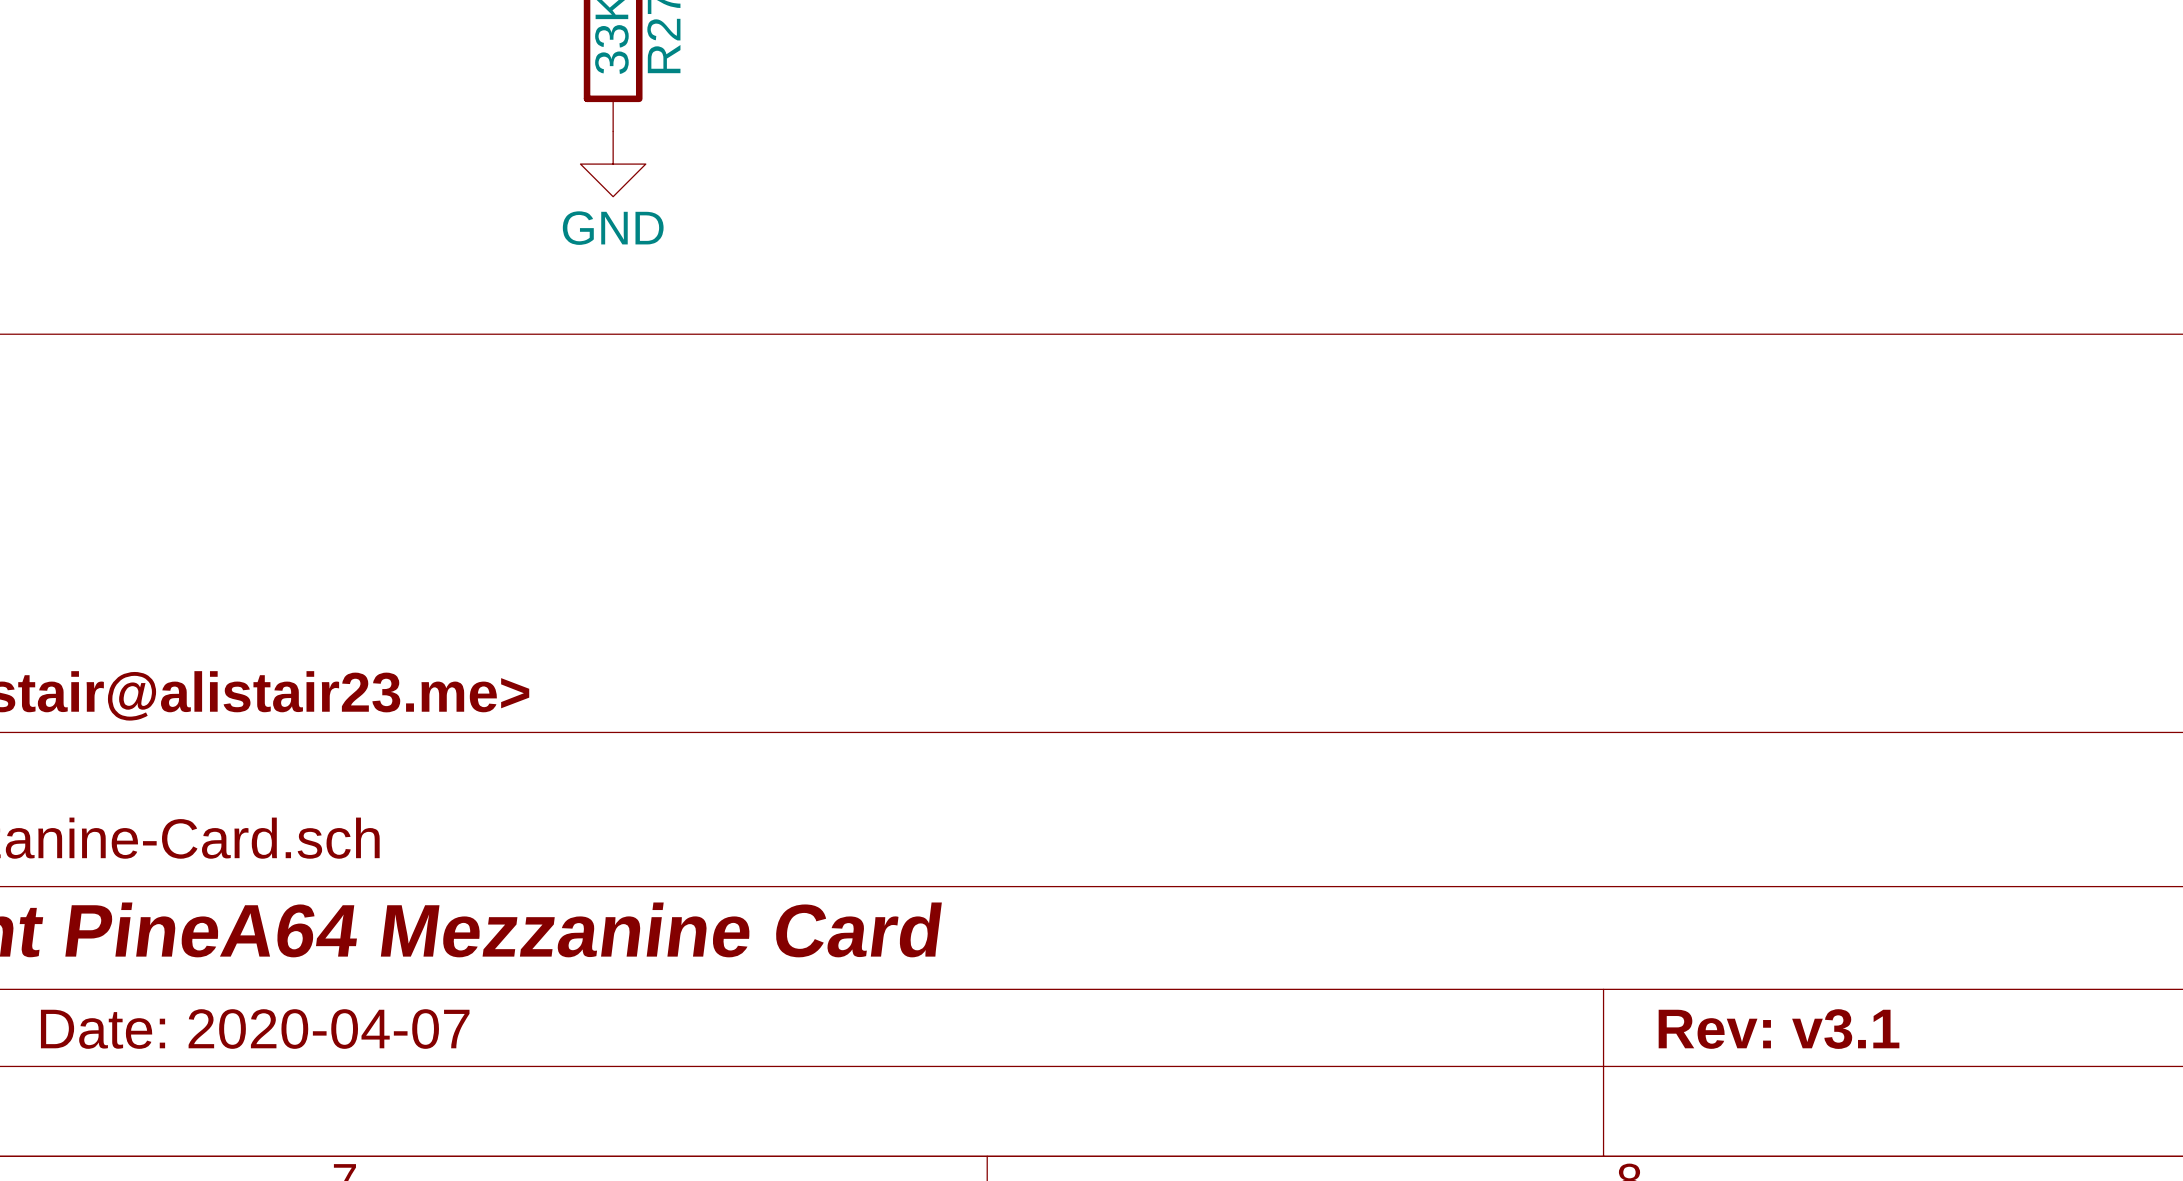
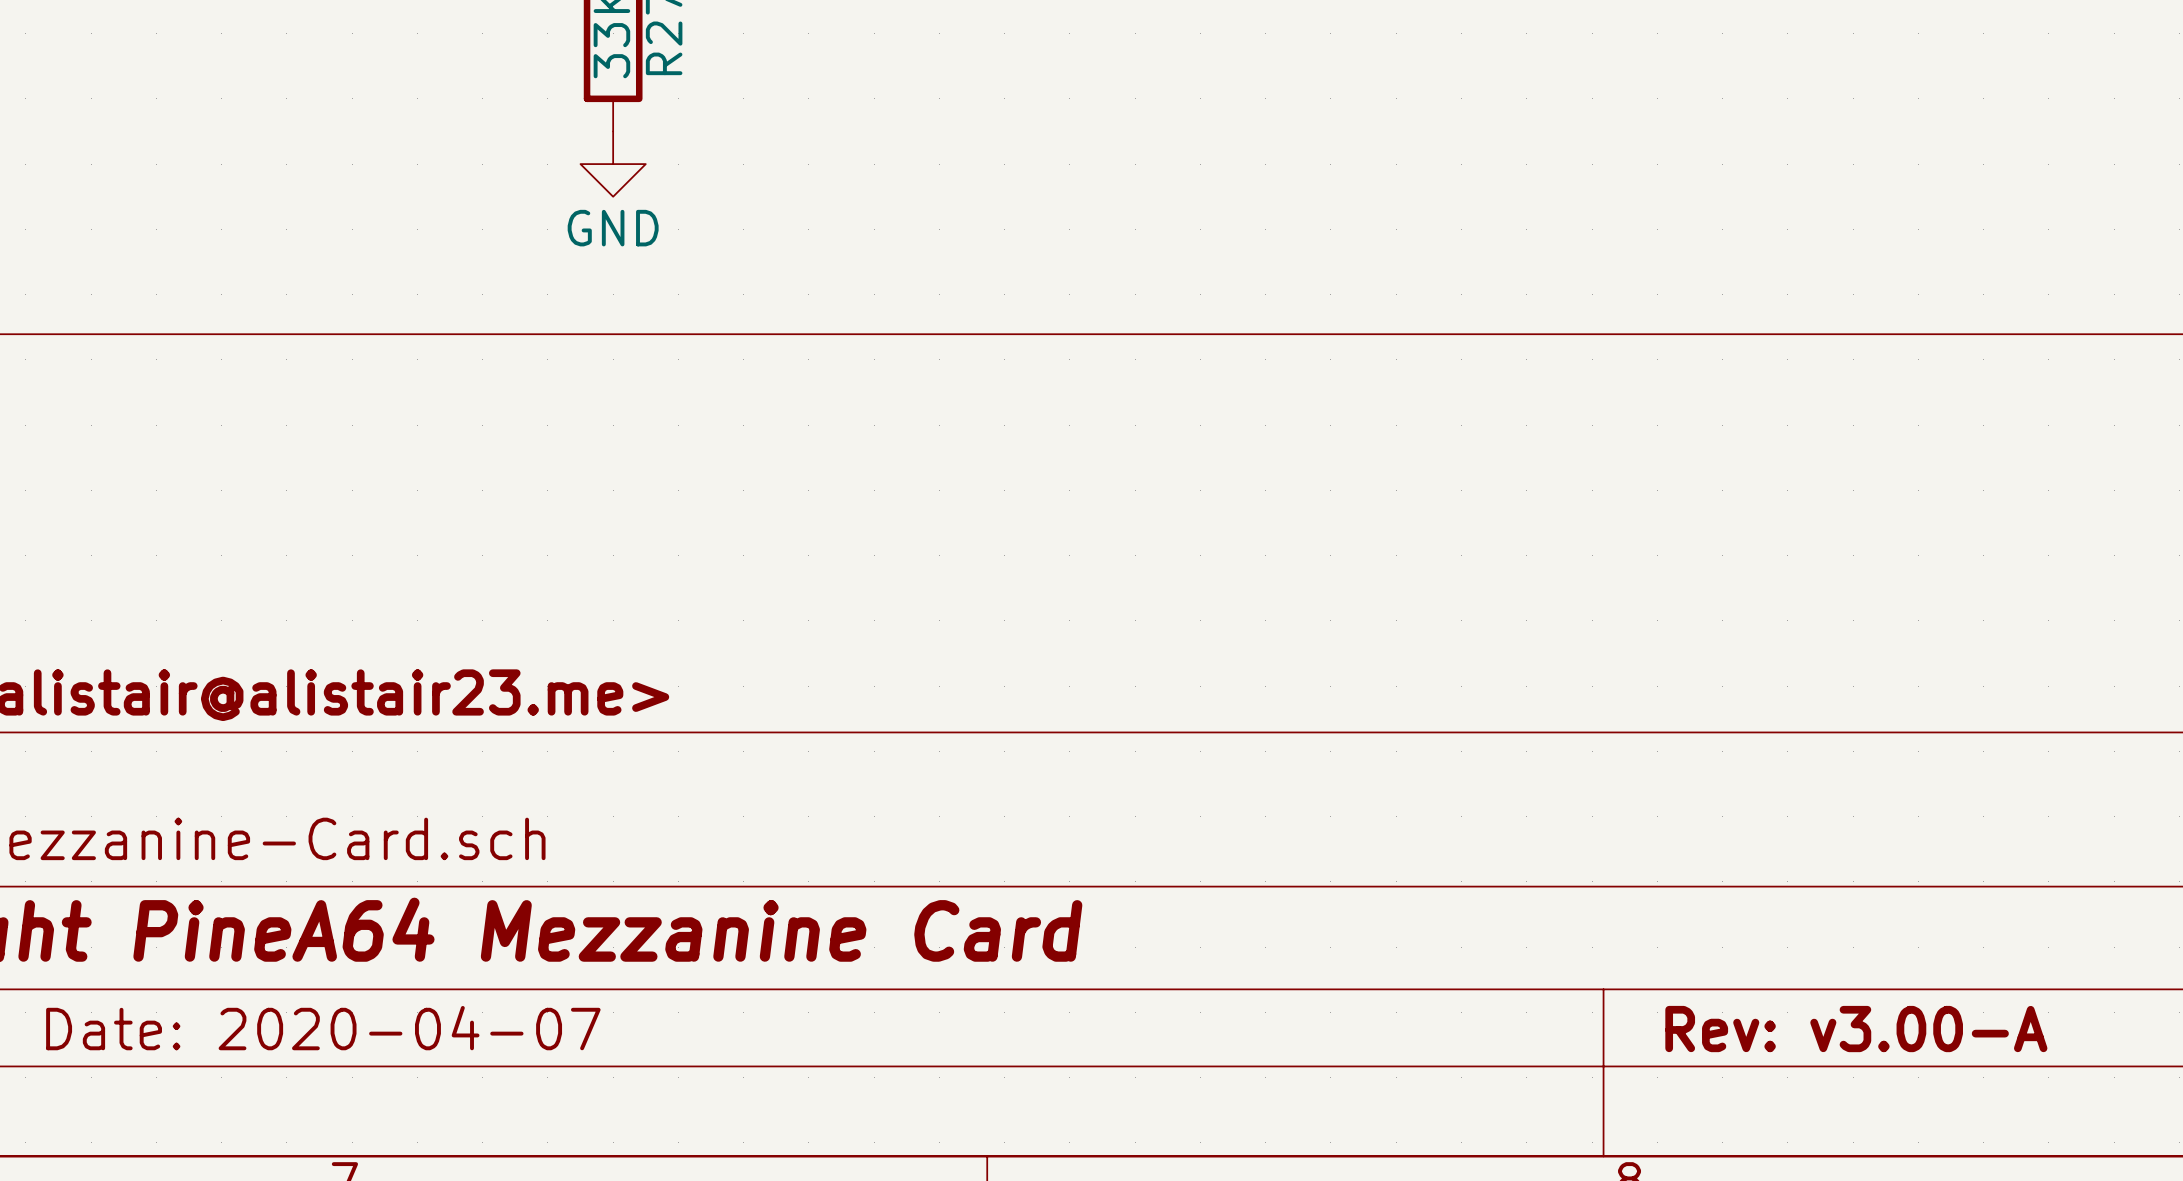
title block: Rev: v3.1 (1779, 1029) -> Rev: v3.00-A (1856, 1029)

